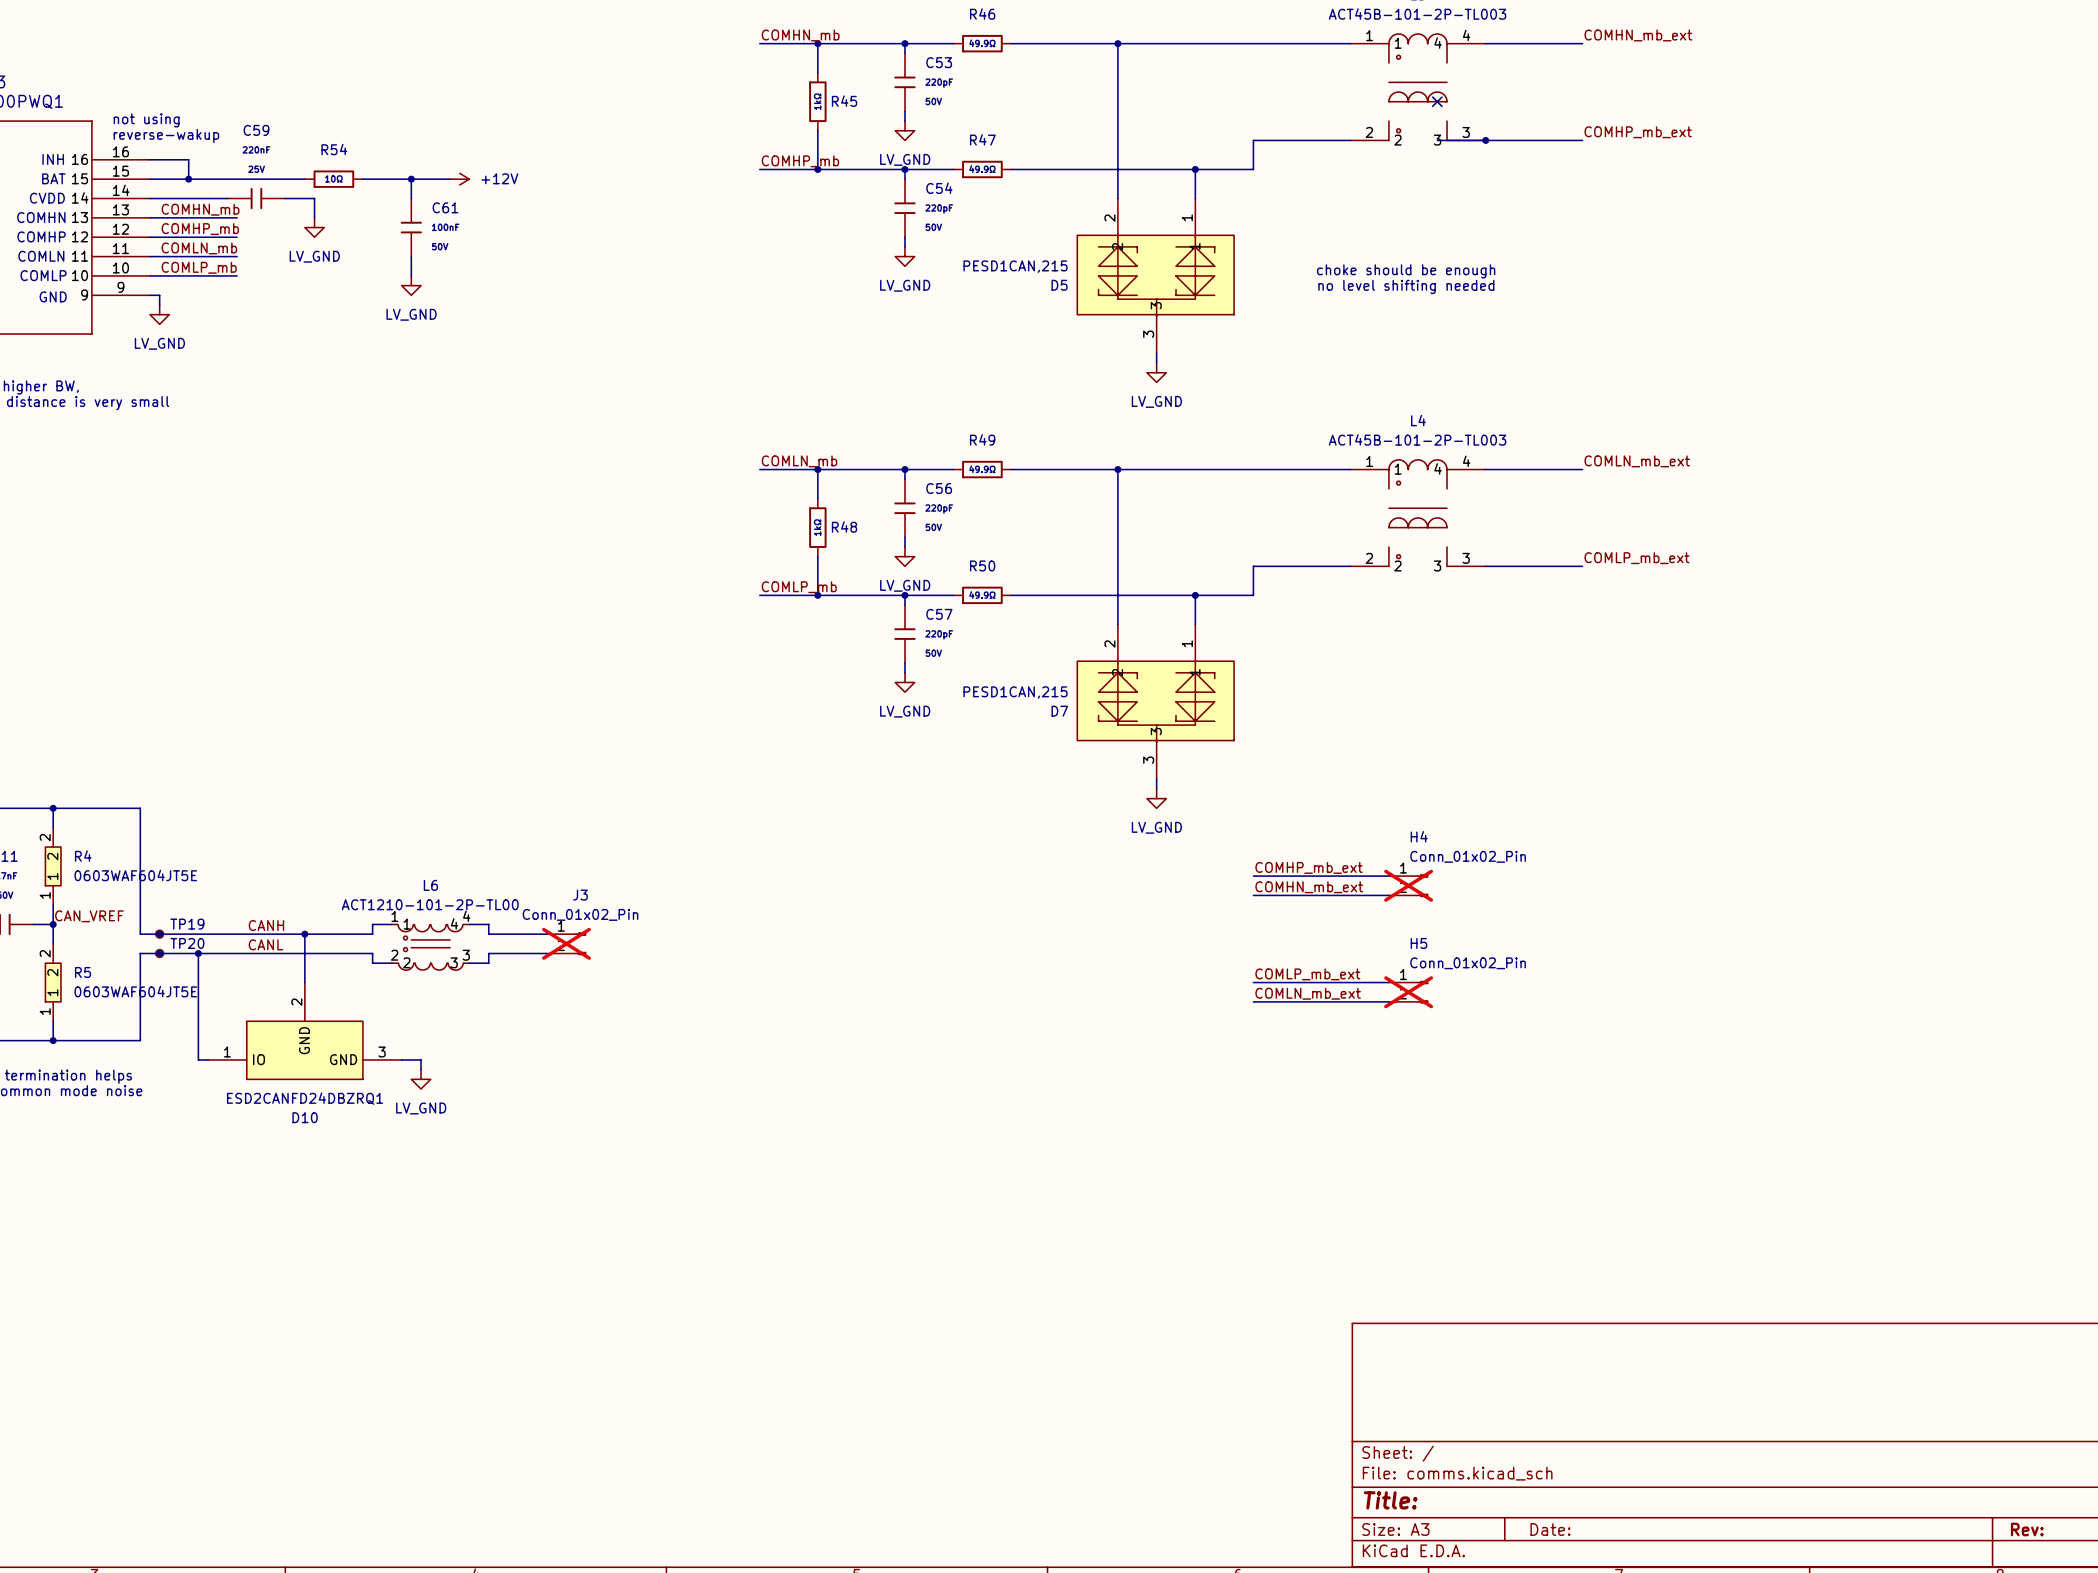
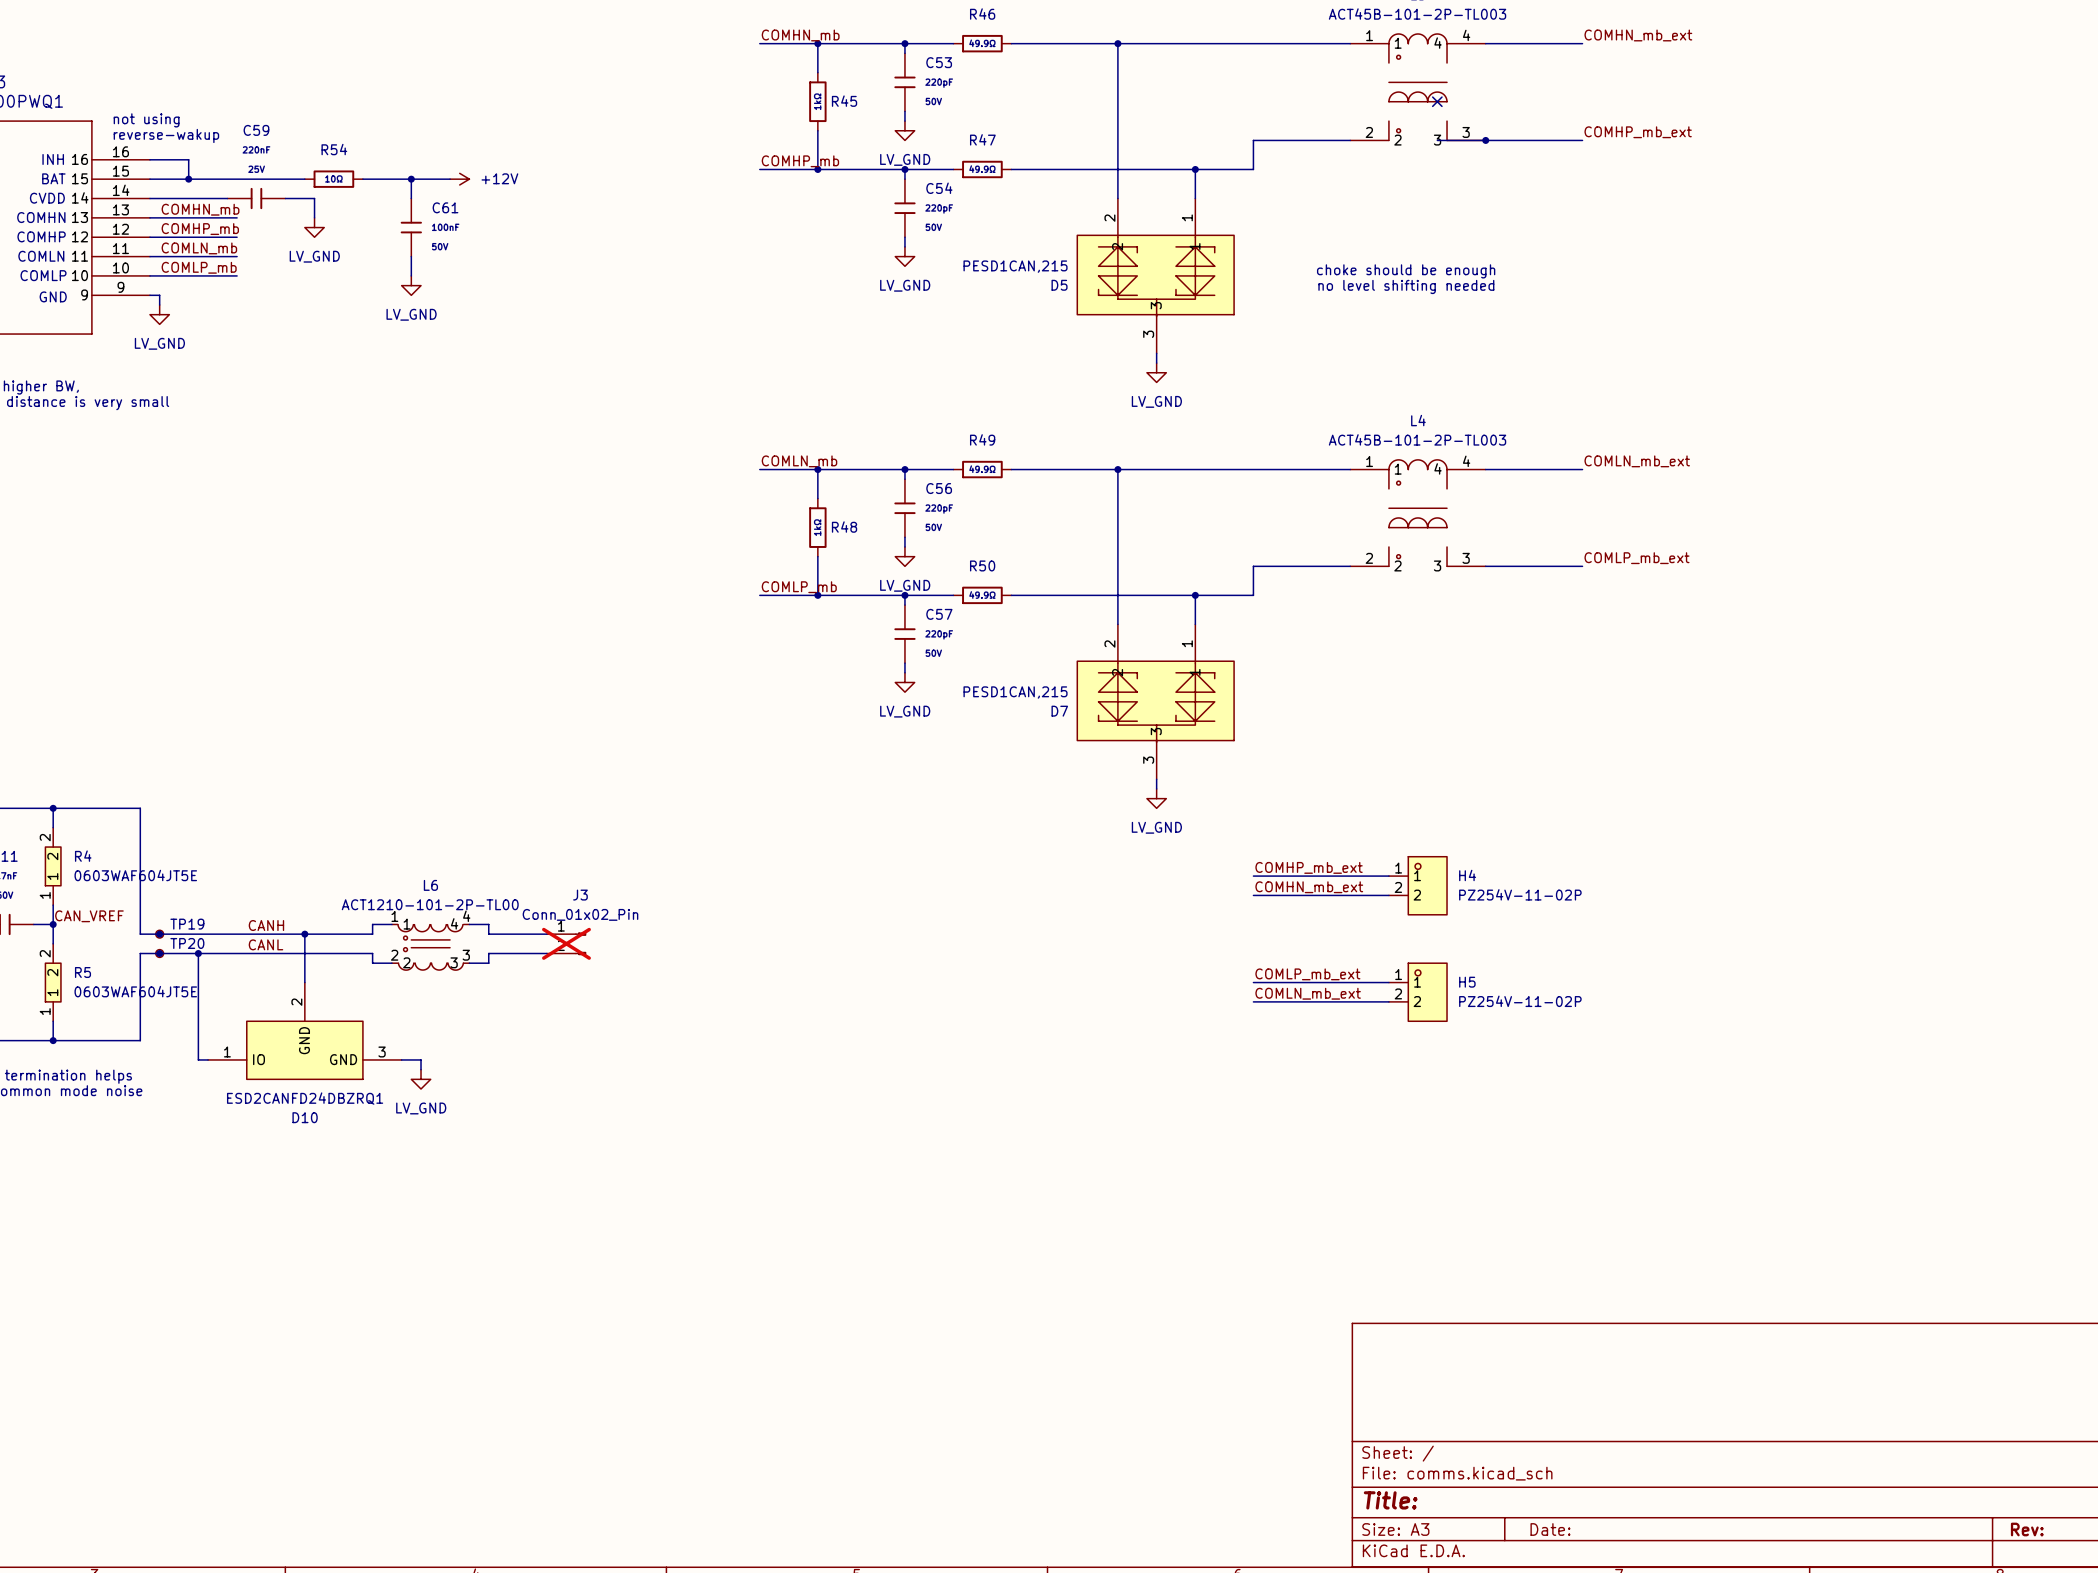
H4 name position: H4 (1419, 836) -> H4 (1467, 875)
H4 value: Conn_01x02_Pin (1468, 856) -> PZ254V-11-02P (1520, 894)
H4 symbol: [1388, 874, 1429, 897] -> [1388, 856, 1448, 915]
H4 do-not-place cross: (1408, 885) -> none
H5 name position: H5 (1418, 943) -> H5 (1467, 982)
H5 value: Conn_01x02_Pin (1468, 963) -> PZ254V-11-02P (1520, 1001)
H5 symbol: [1388, 981, 1429, 1004] -> [1388, 963, 1448, 1022]
H5 do-not-place cross: (1408, 992) -> none

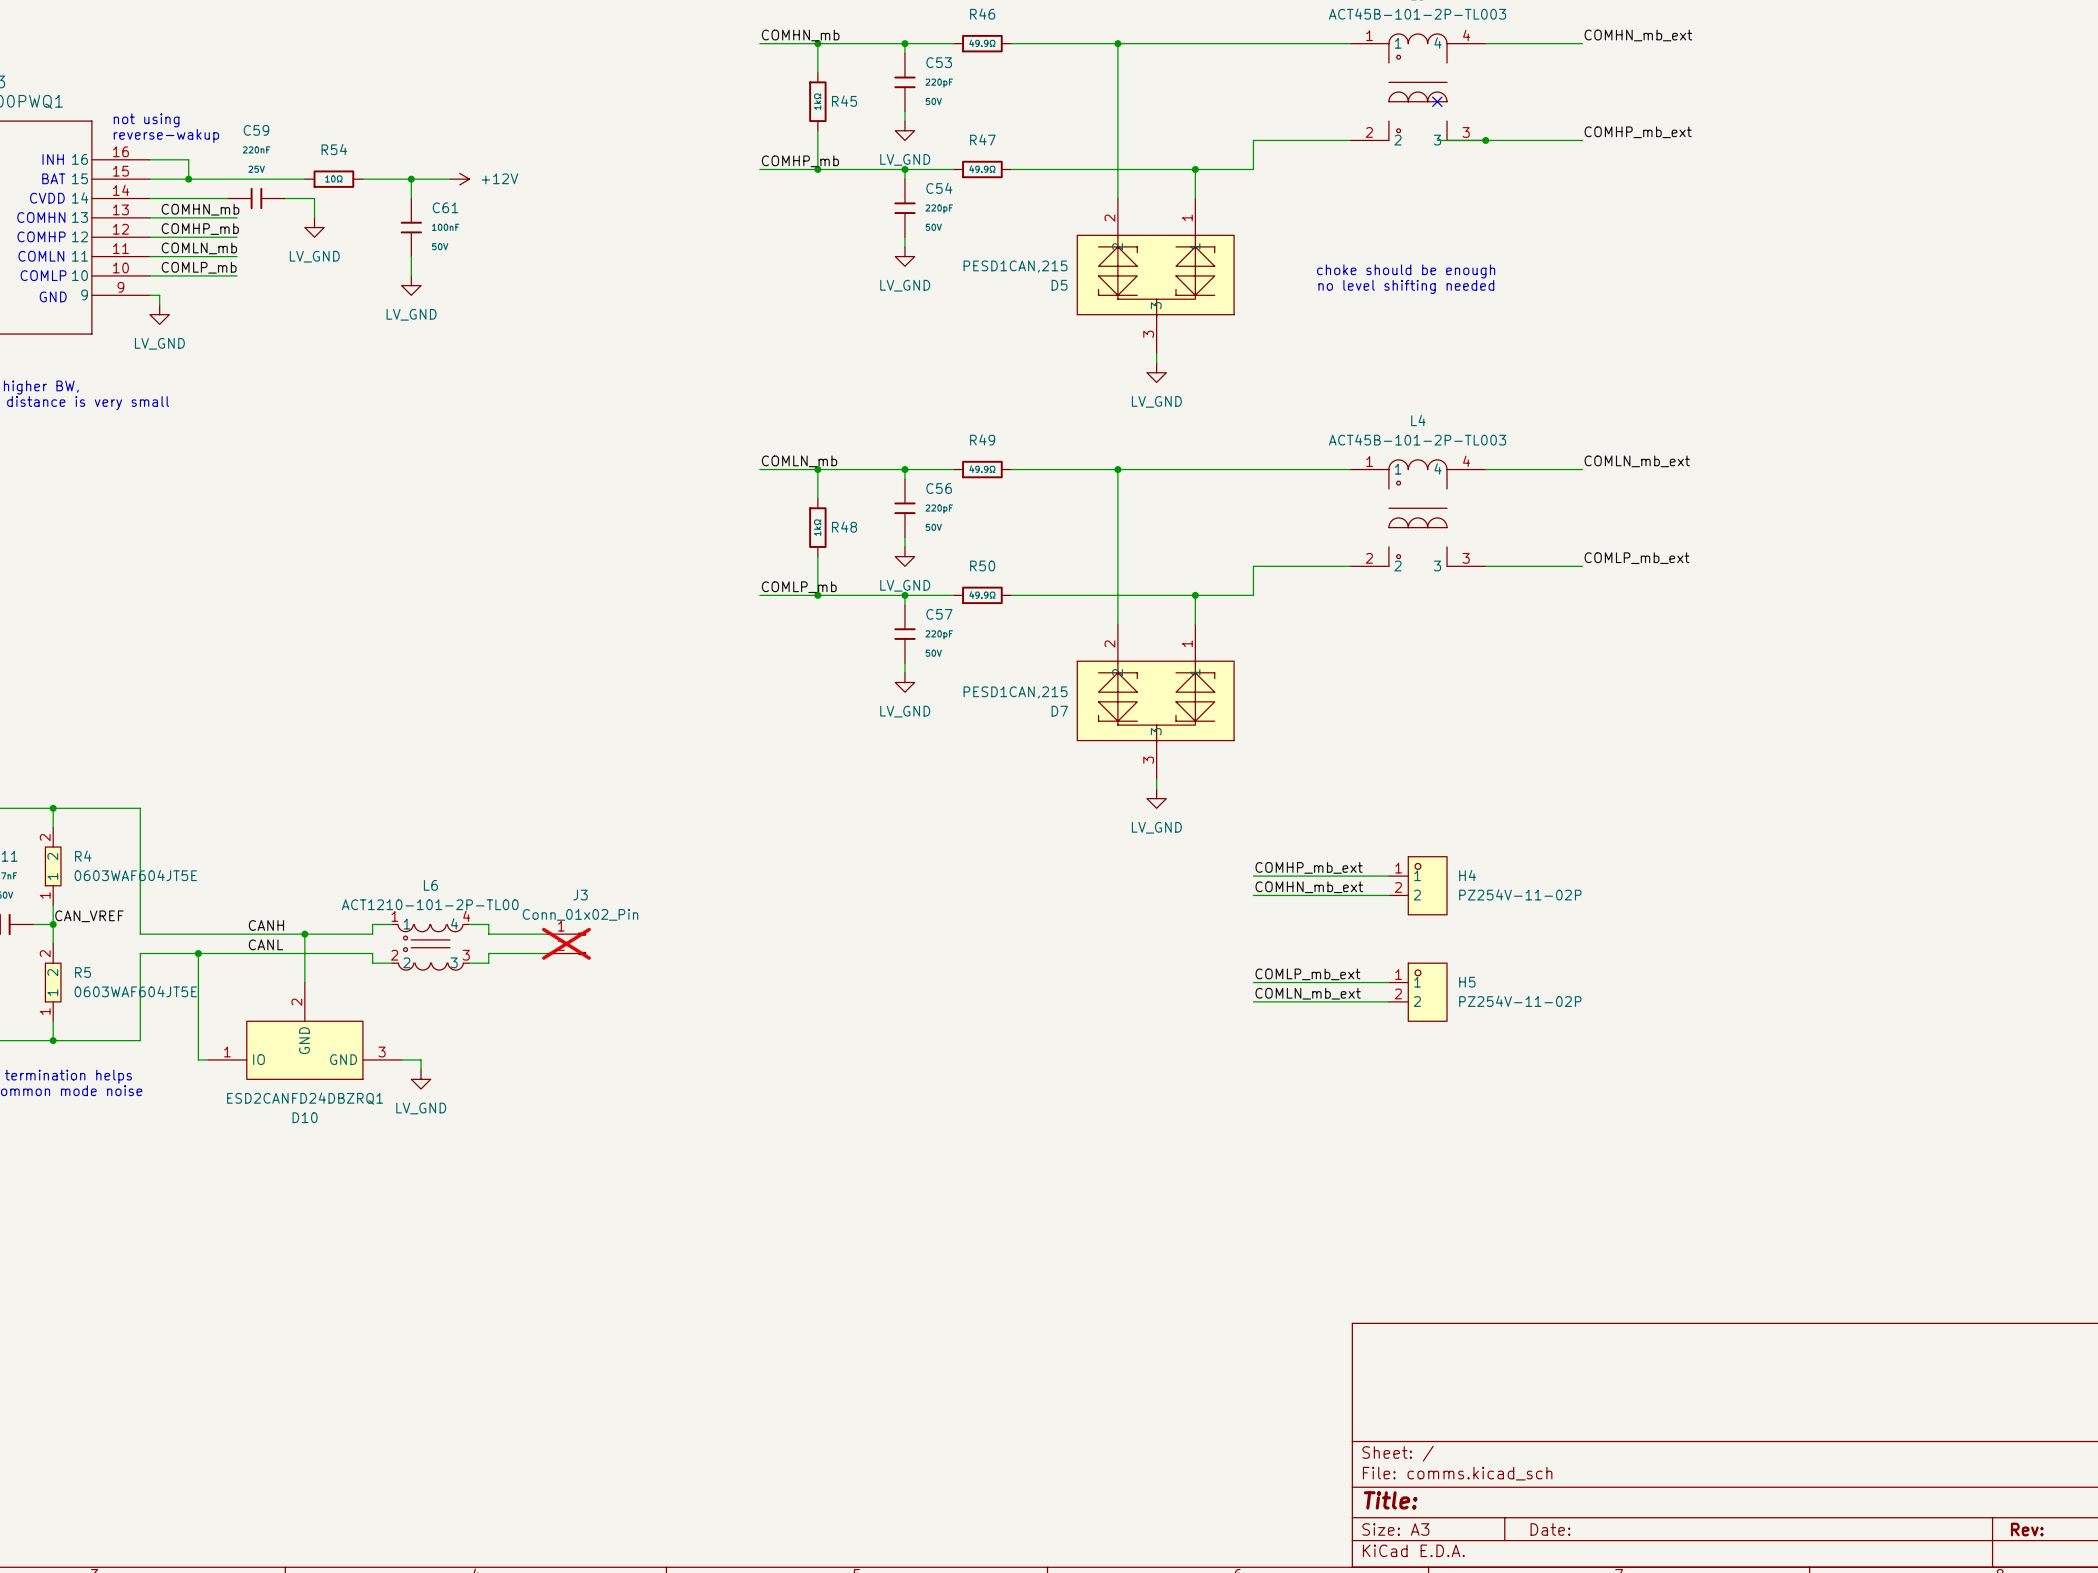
junction: (159, 934) -> none
TP19: (159, 934) -> none
junction: (159, 953) -> none
TP20: (159, 953) -> none

